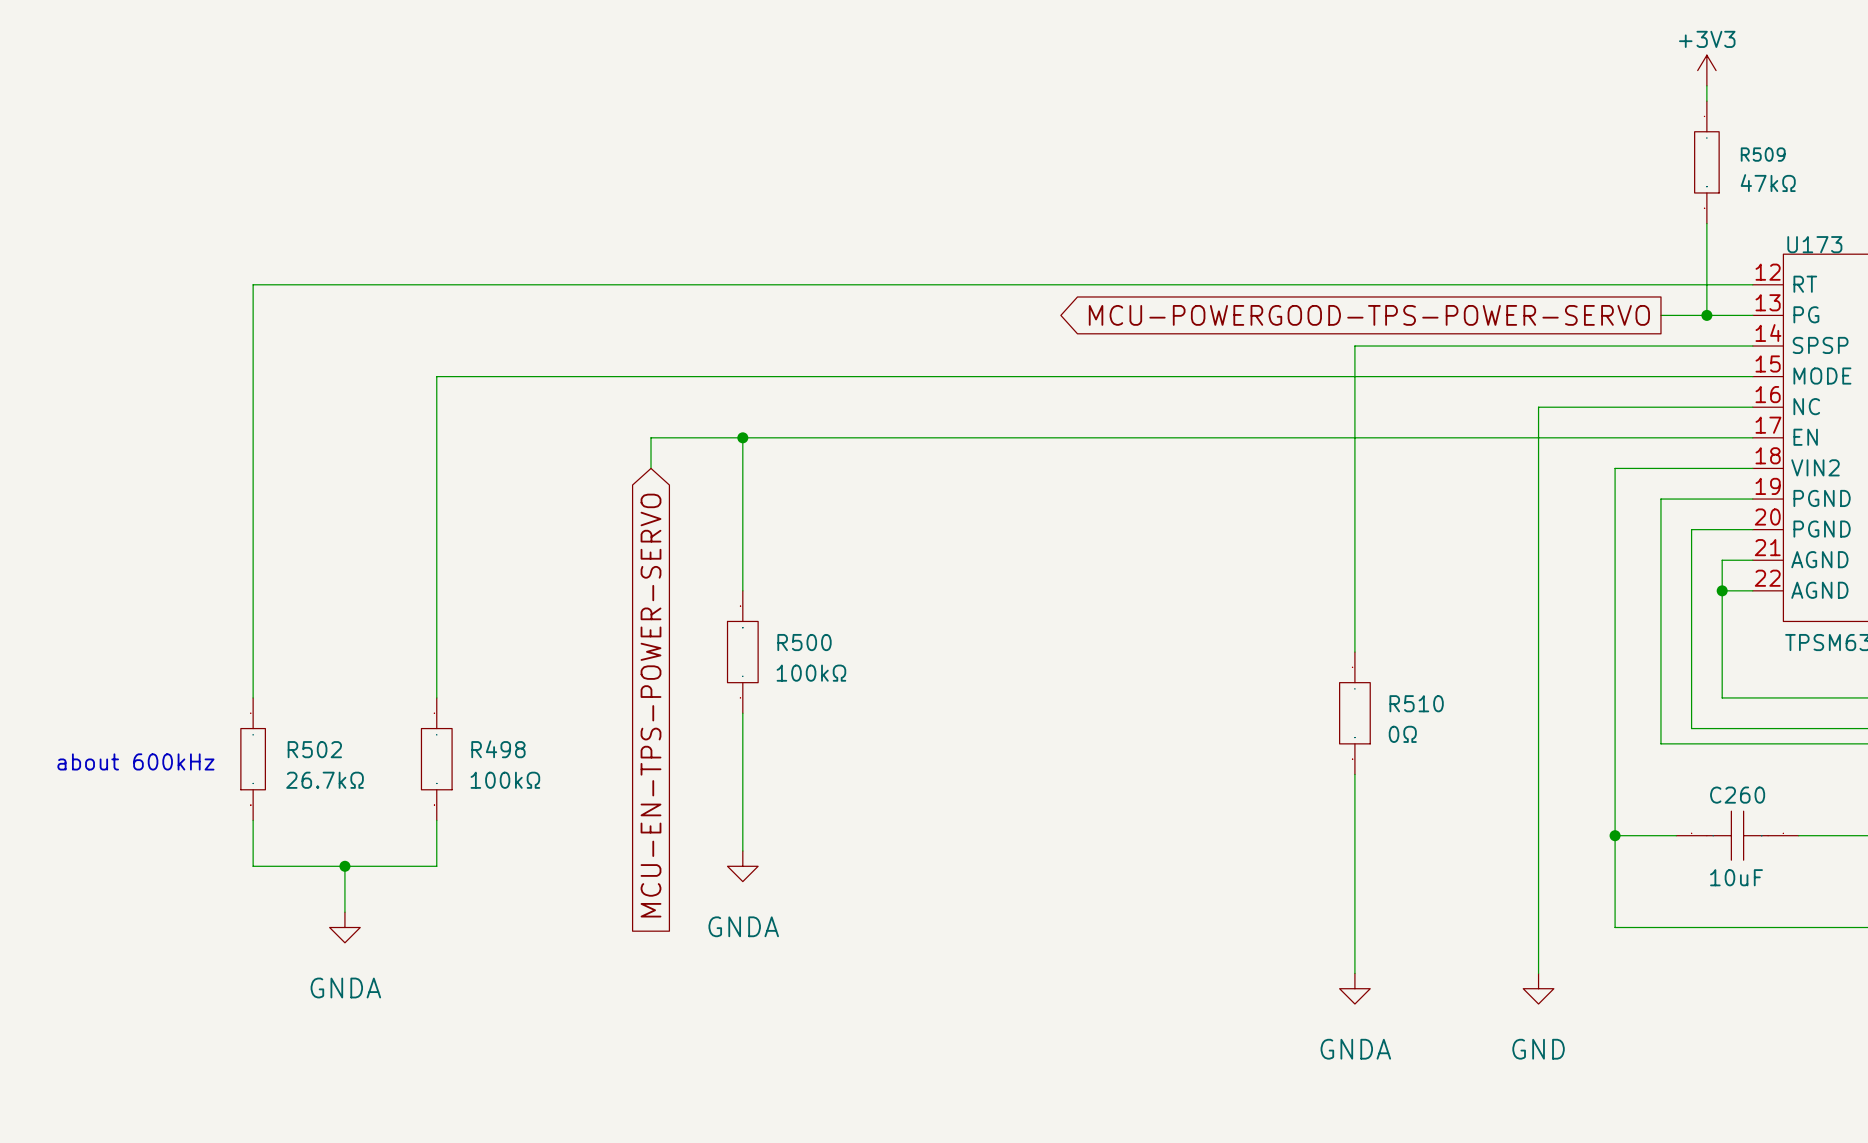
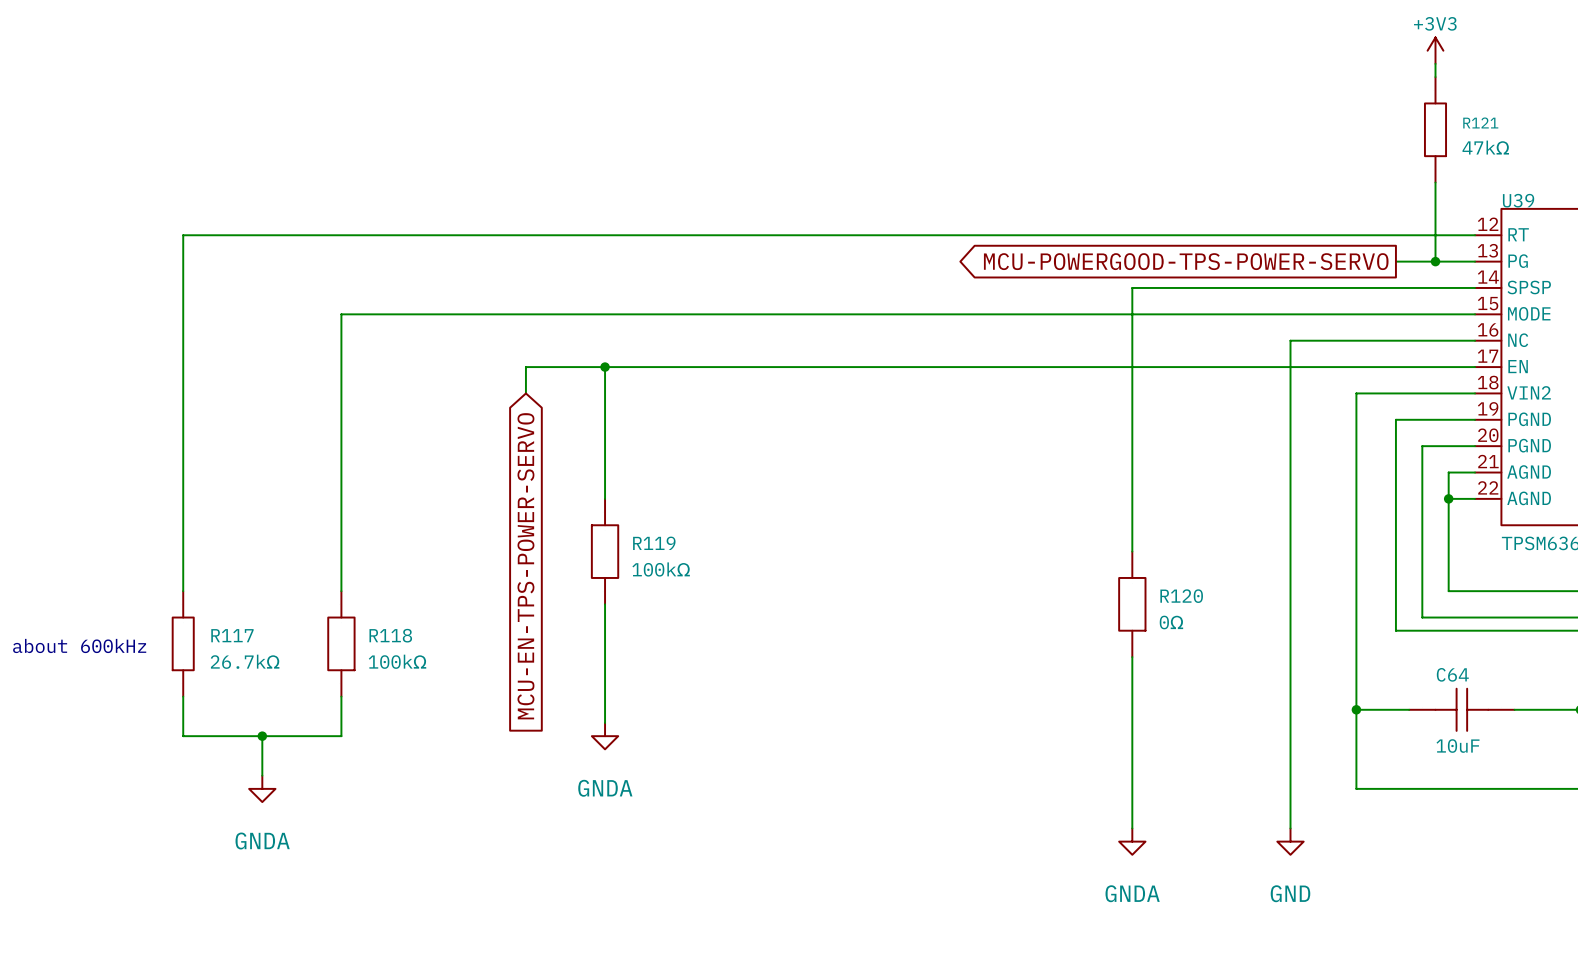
R509 name: R509 (1763, 154) -> R121 (1480, 122)
U173 name: U173 (1814, 244) -> U39 (1518, 200)
R500 name: R500 (804, 642) -> R119 (654, 543)
R510 name: R510 (1416, 703) -> R120 (1181, 596)
R502 name: R502 (314, 749) -> R117 (232, 635)
R498 name: R498 (498, 749) -> R118 (390, 635)
C260 name: C260 (1737, 795) -> C64 (1452, 674)

